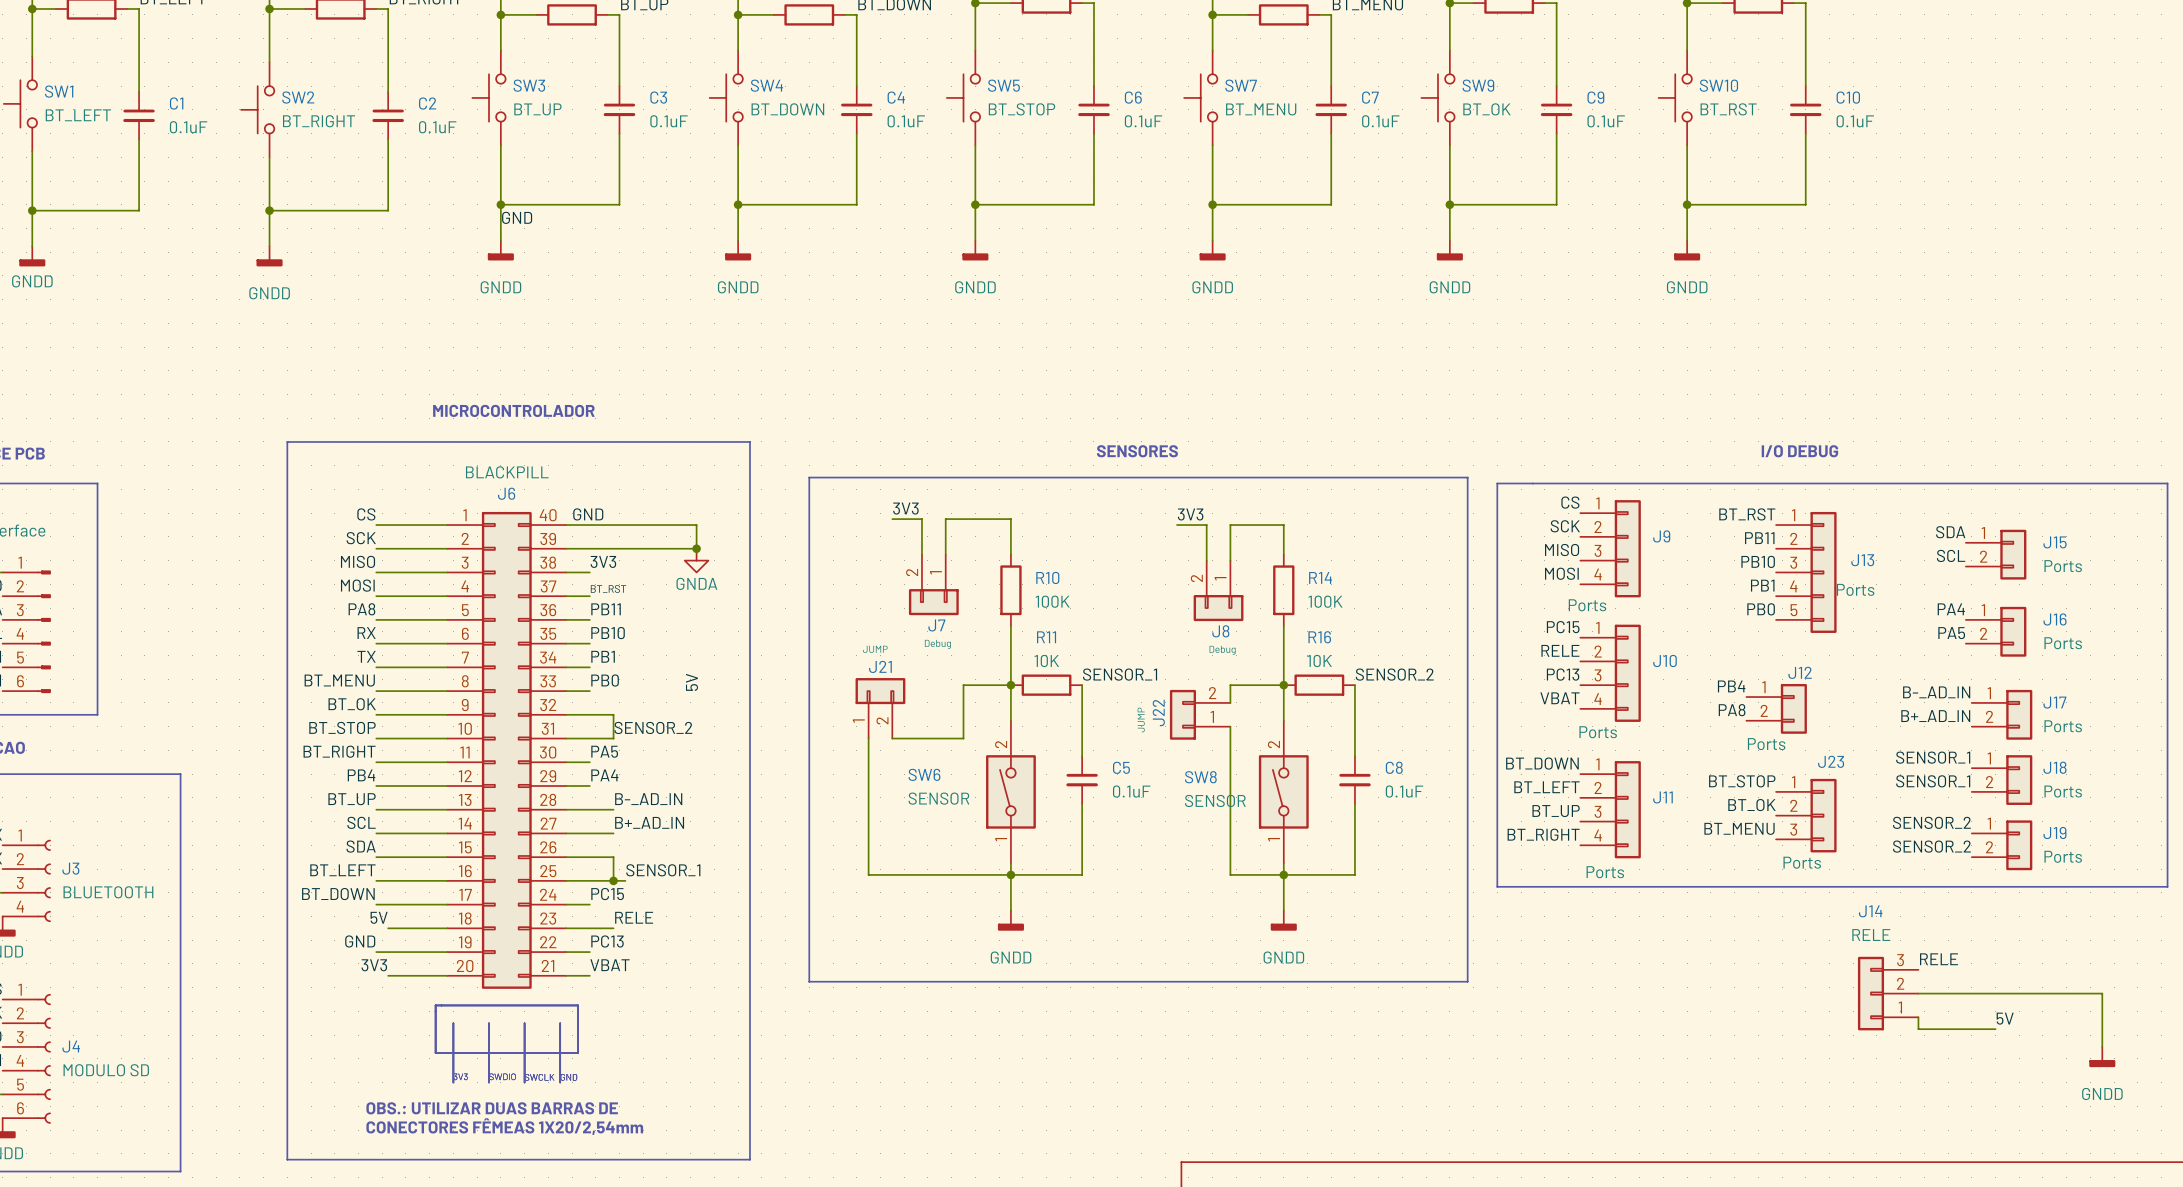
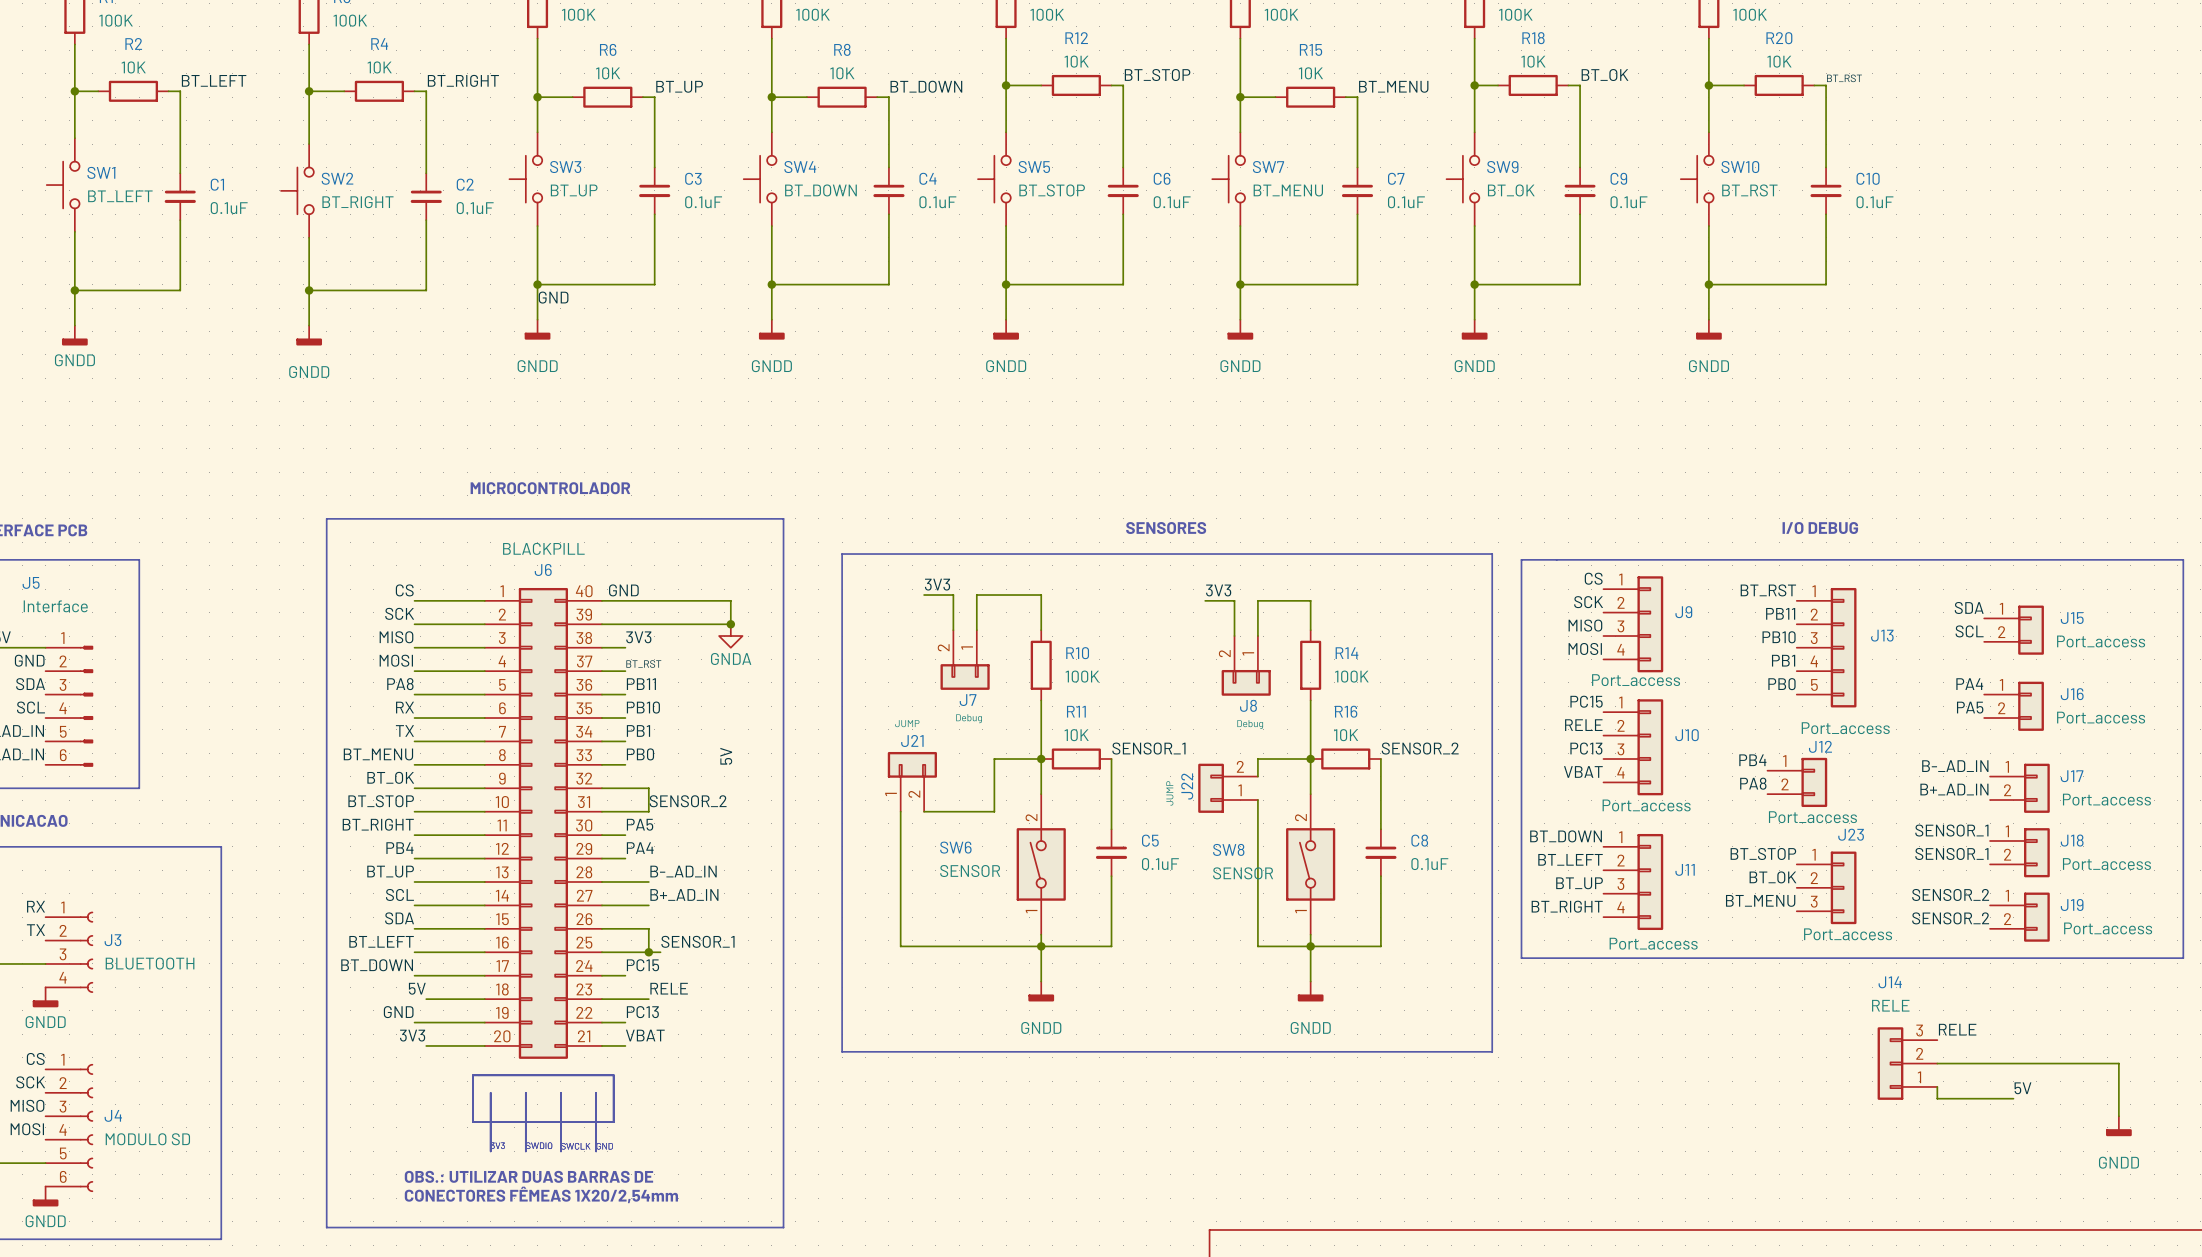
J15 value: Ports (2063, 566) -> Port_access (2101, 641)
J13 value: Ports (1855, 589) -> Port_access (1845, 728)
J9 value: Ports (1587, 605) -> Port_access (1636, 680)
J16 value: Ports (2063, 643) -> Port_access (2101, 717)
J17 value: Ports (2063, 726) -> Port_access (2106, 799)
J10 value: Ports (1598, 732) -> Port_access (1646, 805)
J12 value: Ports (1766, 744) -> Port_access (1812, 817)
J18 value: Ports (2063, 791) -> Port_access (2106, 864)
J19 value: Ports (2063, 856) -> Port_access (2108, 928)
J23 value: Ports (1802, 862) -> Port_access (1848, 934)
J11 value: Ports (1605, 872) -> Port_access (1653, 943)

